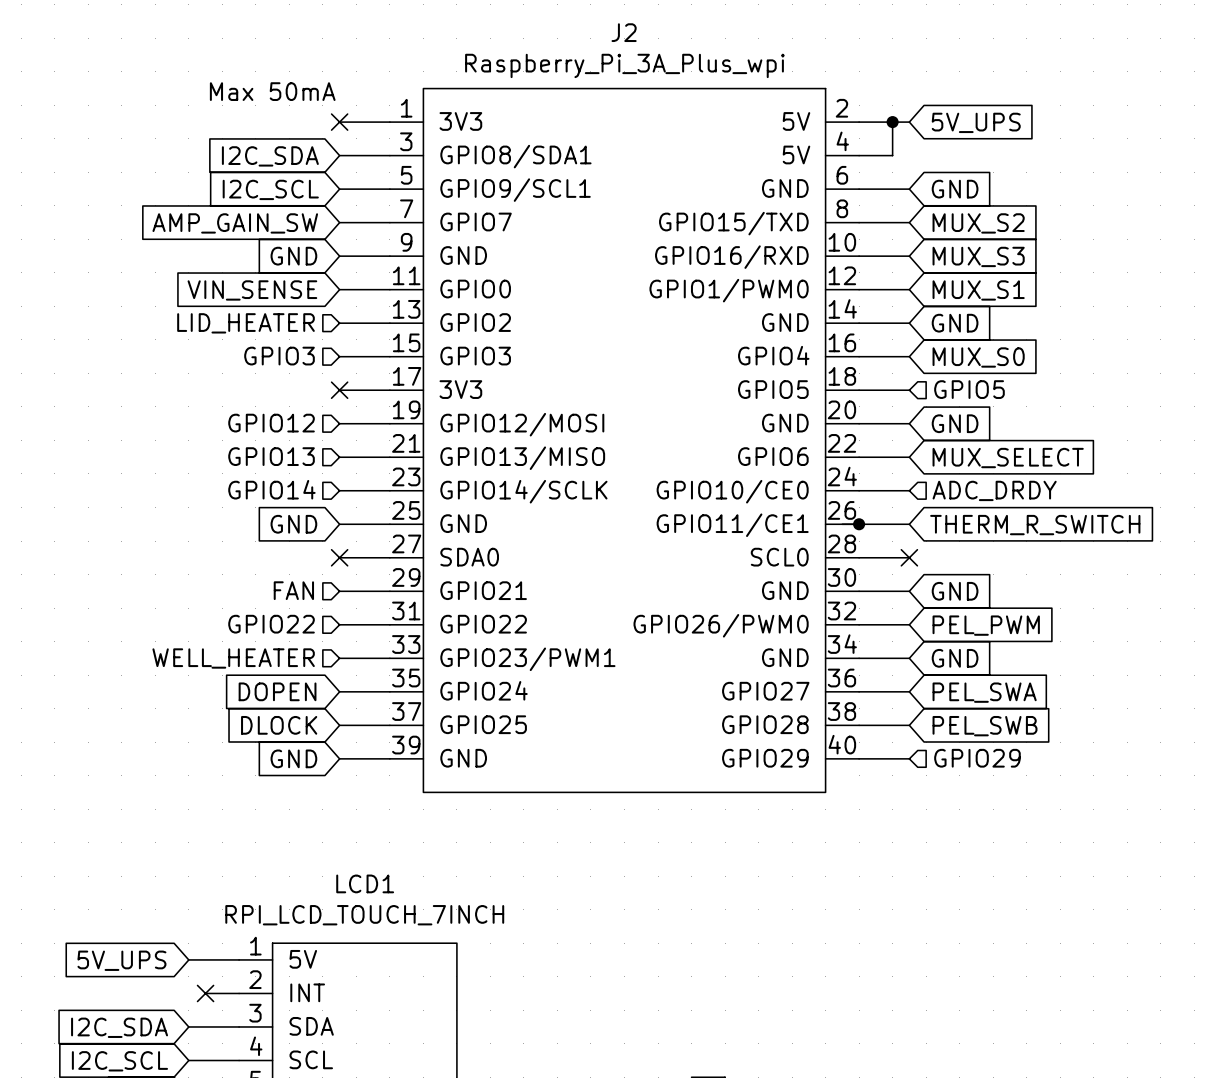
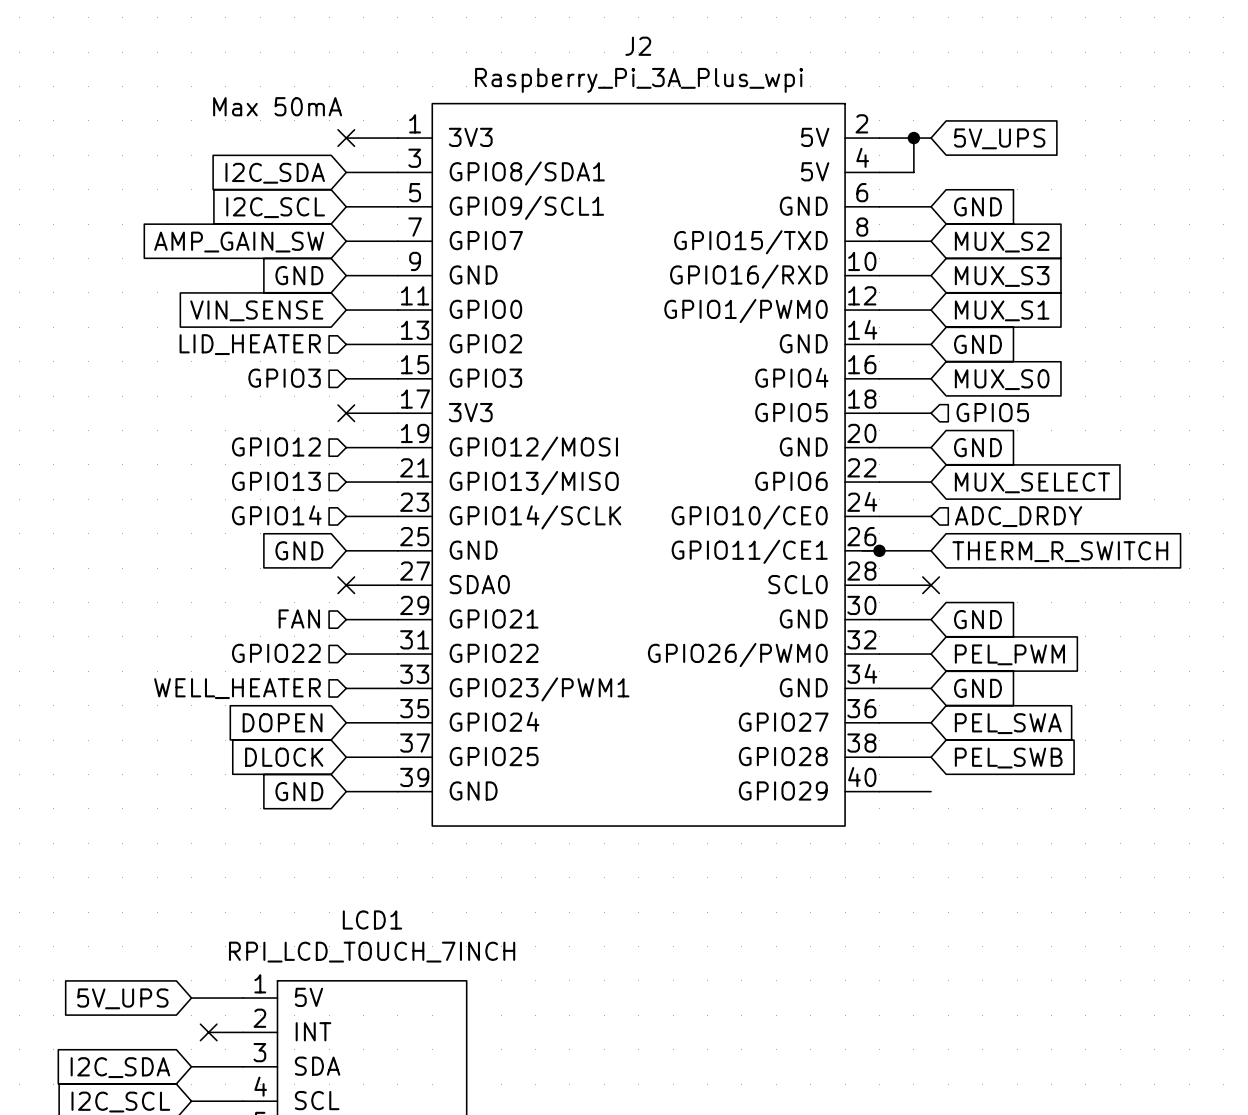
hierarchical label: GPIO29 (977, 758) -> none

